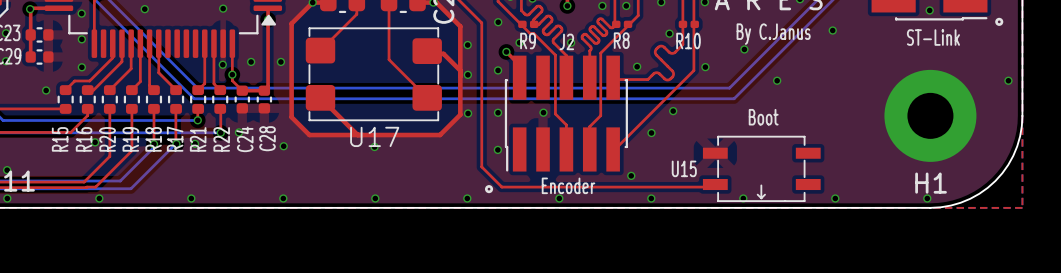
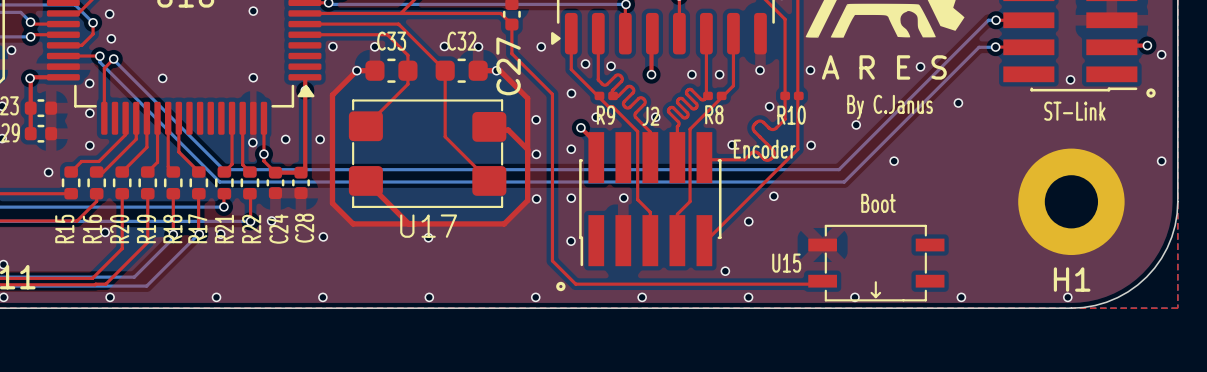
text position: Encoder (568, 185) -> Encoder (764, 149)

